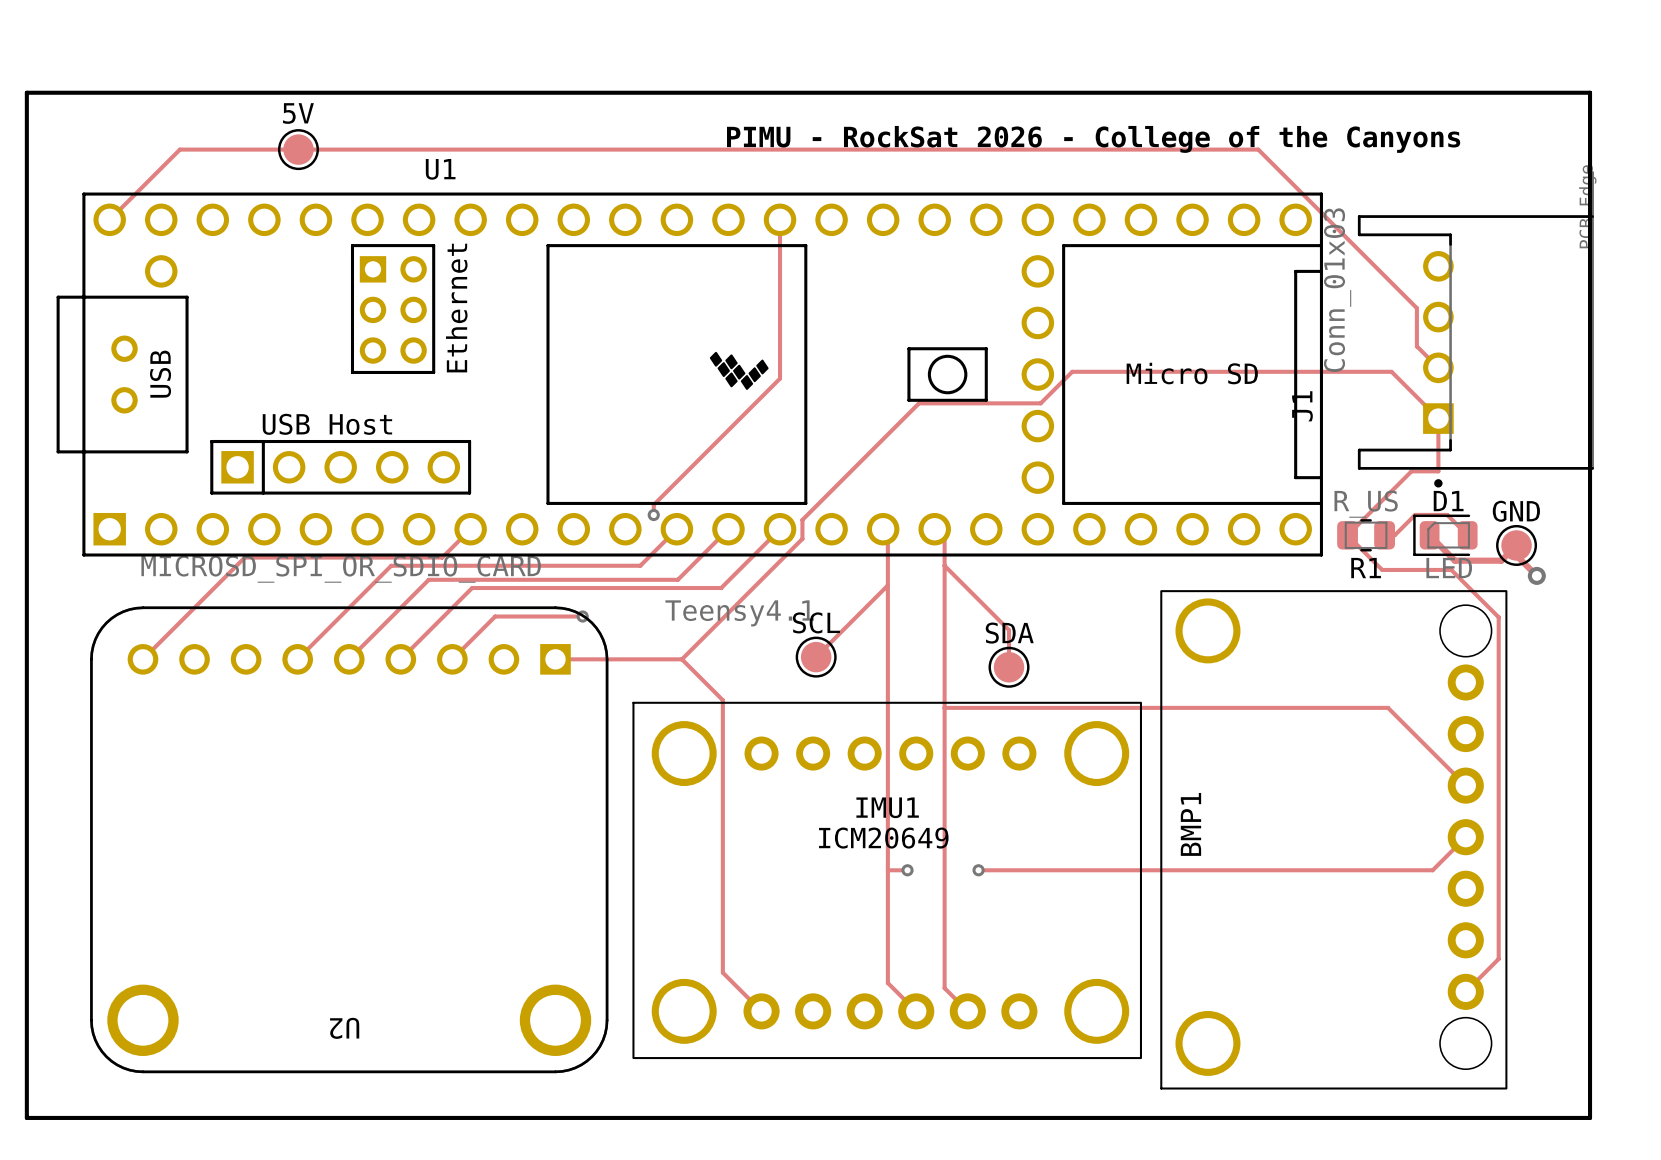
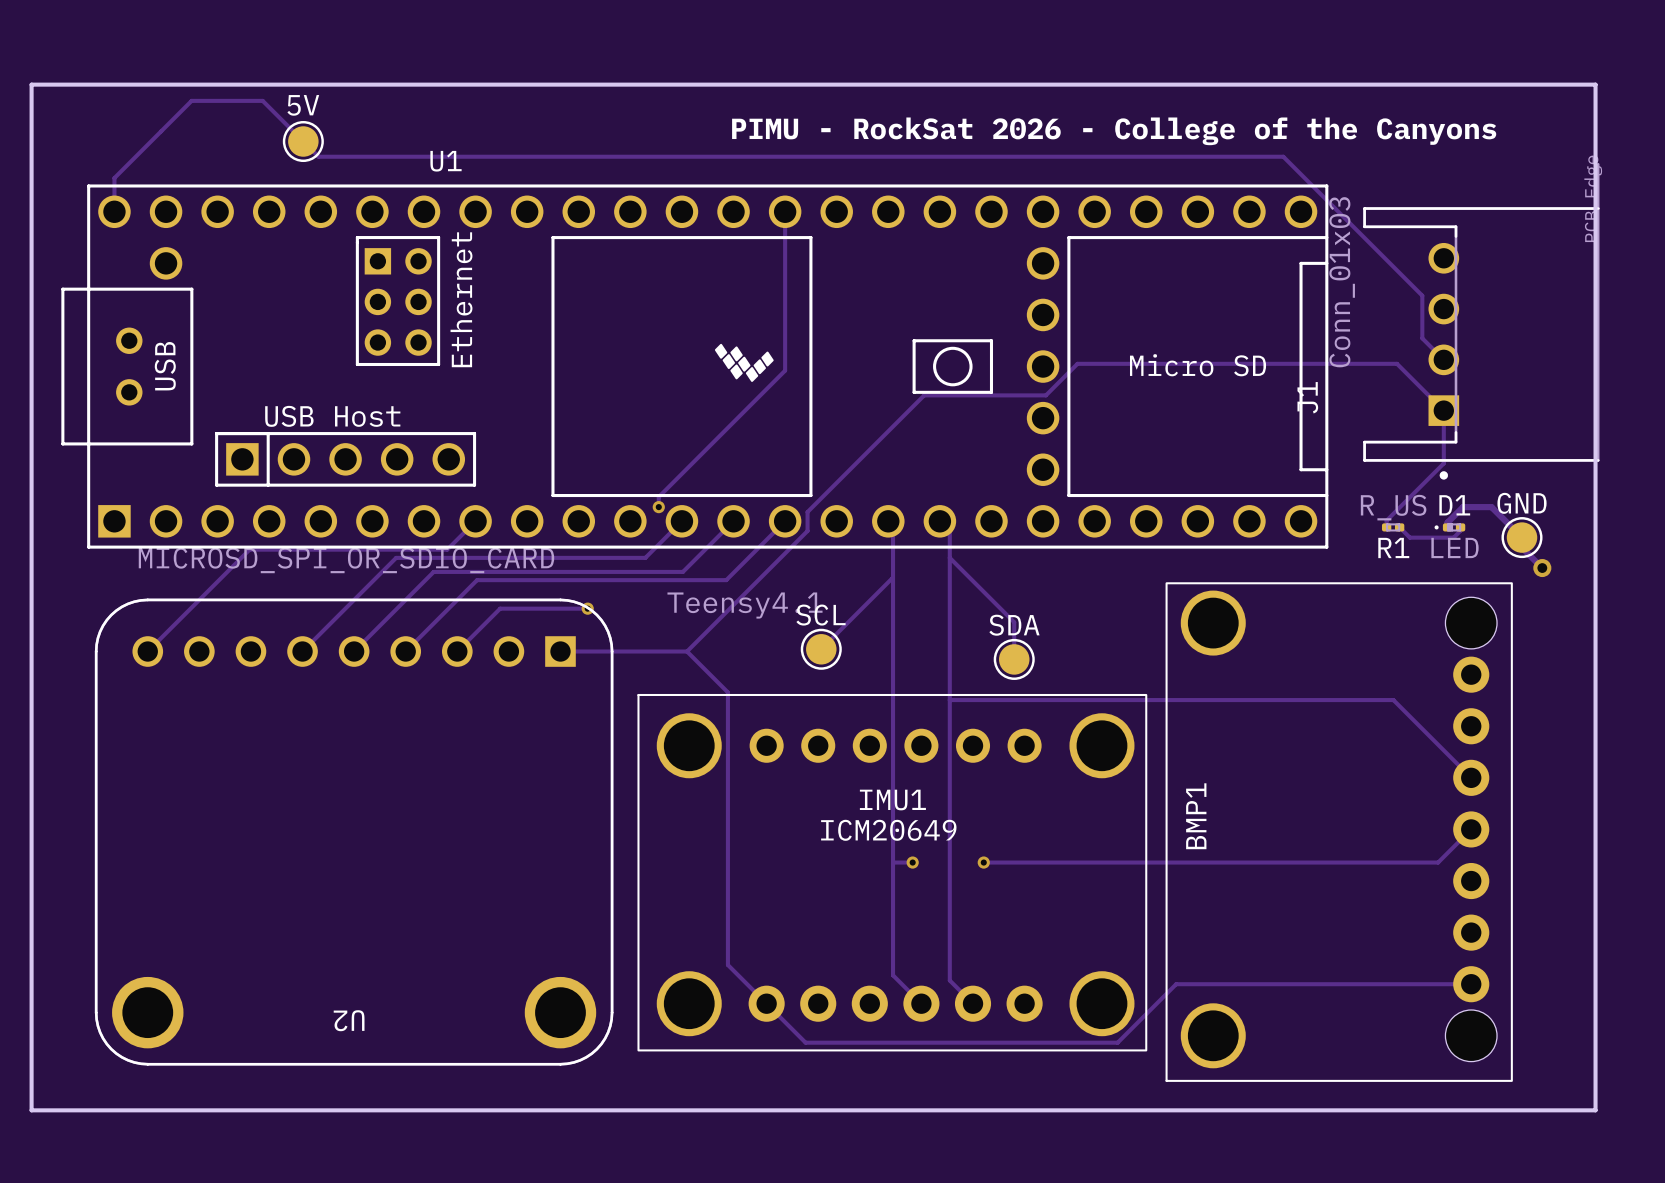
track: (109, 219) (179, 149) (1258, 149) (1416, 308) -> (114, 211) (114, 178) (191, 100) (262, 100) (318, 156) (1283, 156) (1422, 295) (1422, 300)
track: (1438, 471) (1411, 471) (1347, 535) (1382, 569) (1451, 569) (1498, 617) (1498, 958) (1465, 991) -> (1443, 463) (1386, 520) (1386, 527)
D1 footprint: [1413, 514, 1478, 557] -> [1434, 523, 1466, 532]
R1 footprint: [1337, 519, 1395, 552] -> [1381, 523, 1405, 532]
track: (1384, 535) (1394, 535) (1415, 514) (1447, 514) (1467, 535) -> none
track: none -> (1399, 527) (1409, 537) (1453, 537) (1460, 530) (1460, 527)
track: (1429, 535) (1454, 560) (1501, 560) (1516, 545) -> (1447, 527) (1447, 522) (1463, 507) (1491, 507) (1522, 537)
track: none -> (1471, 984) (1176, 984) (1117, 1042) (805, 1042) (766, 1003)

